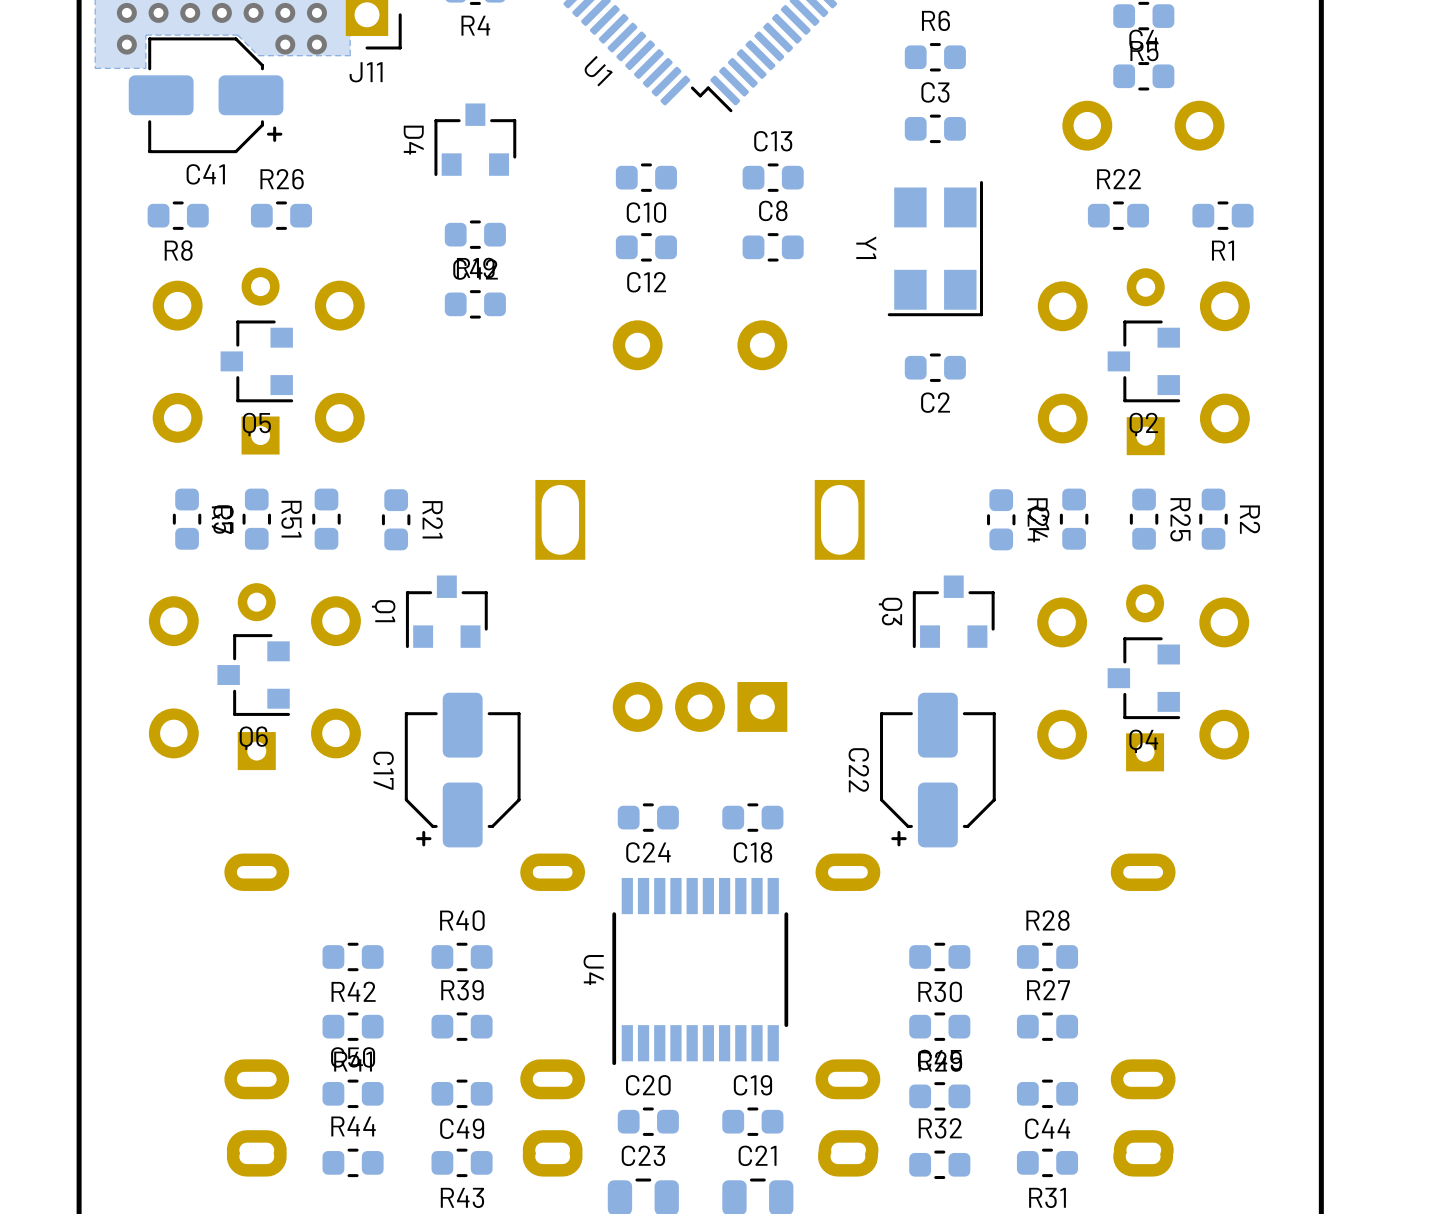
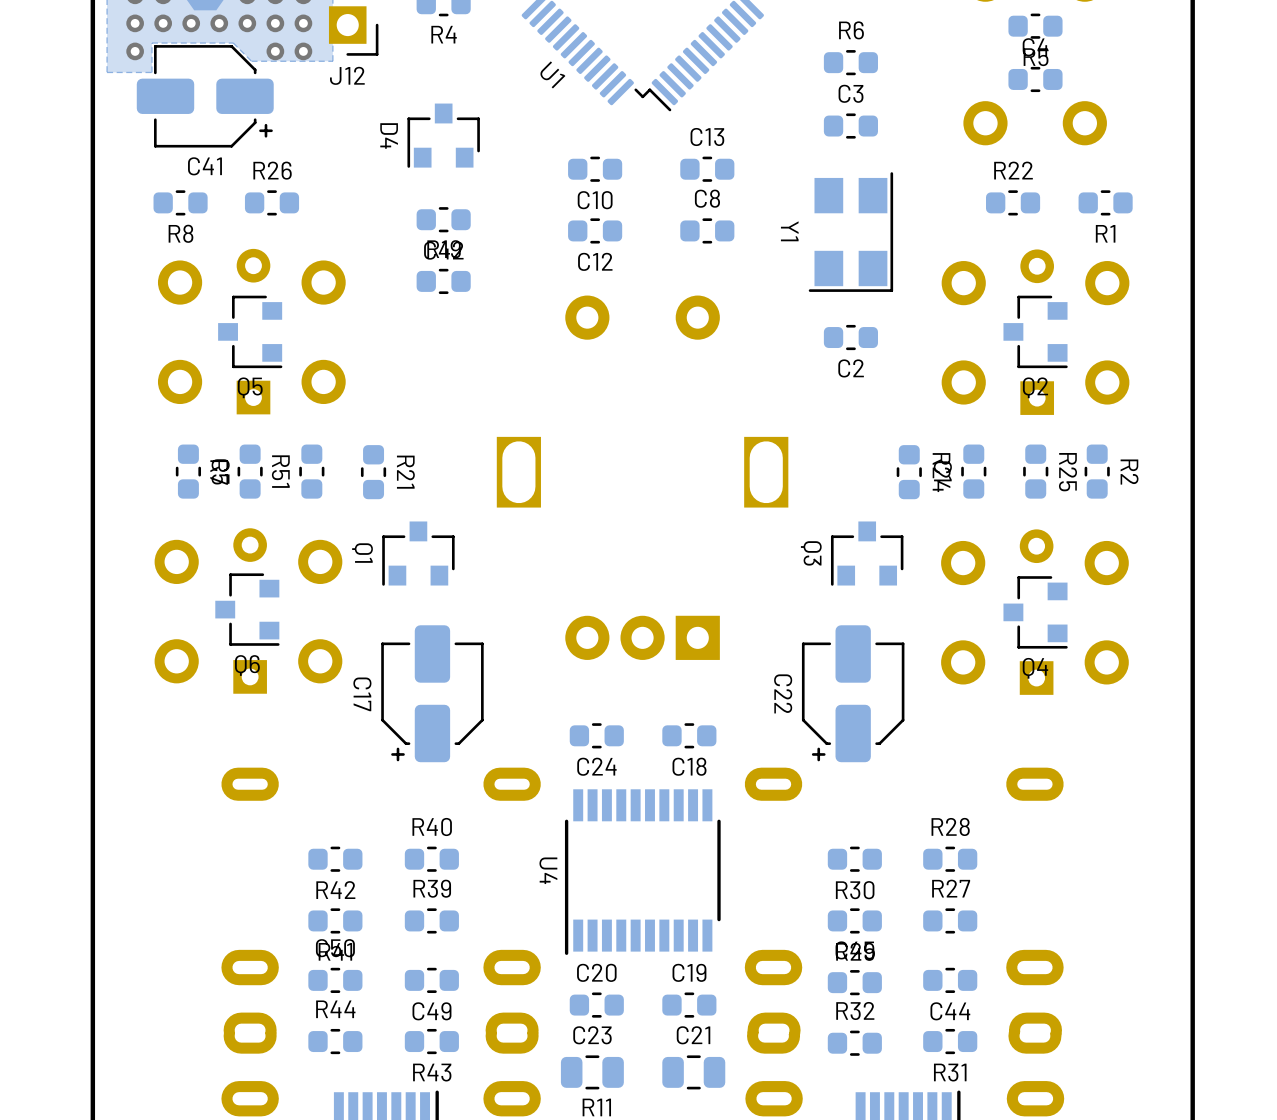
J11 name: J11 (366, 72) -> J12 (347, 75)

